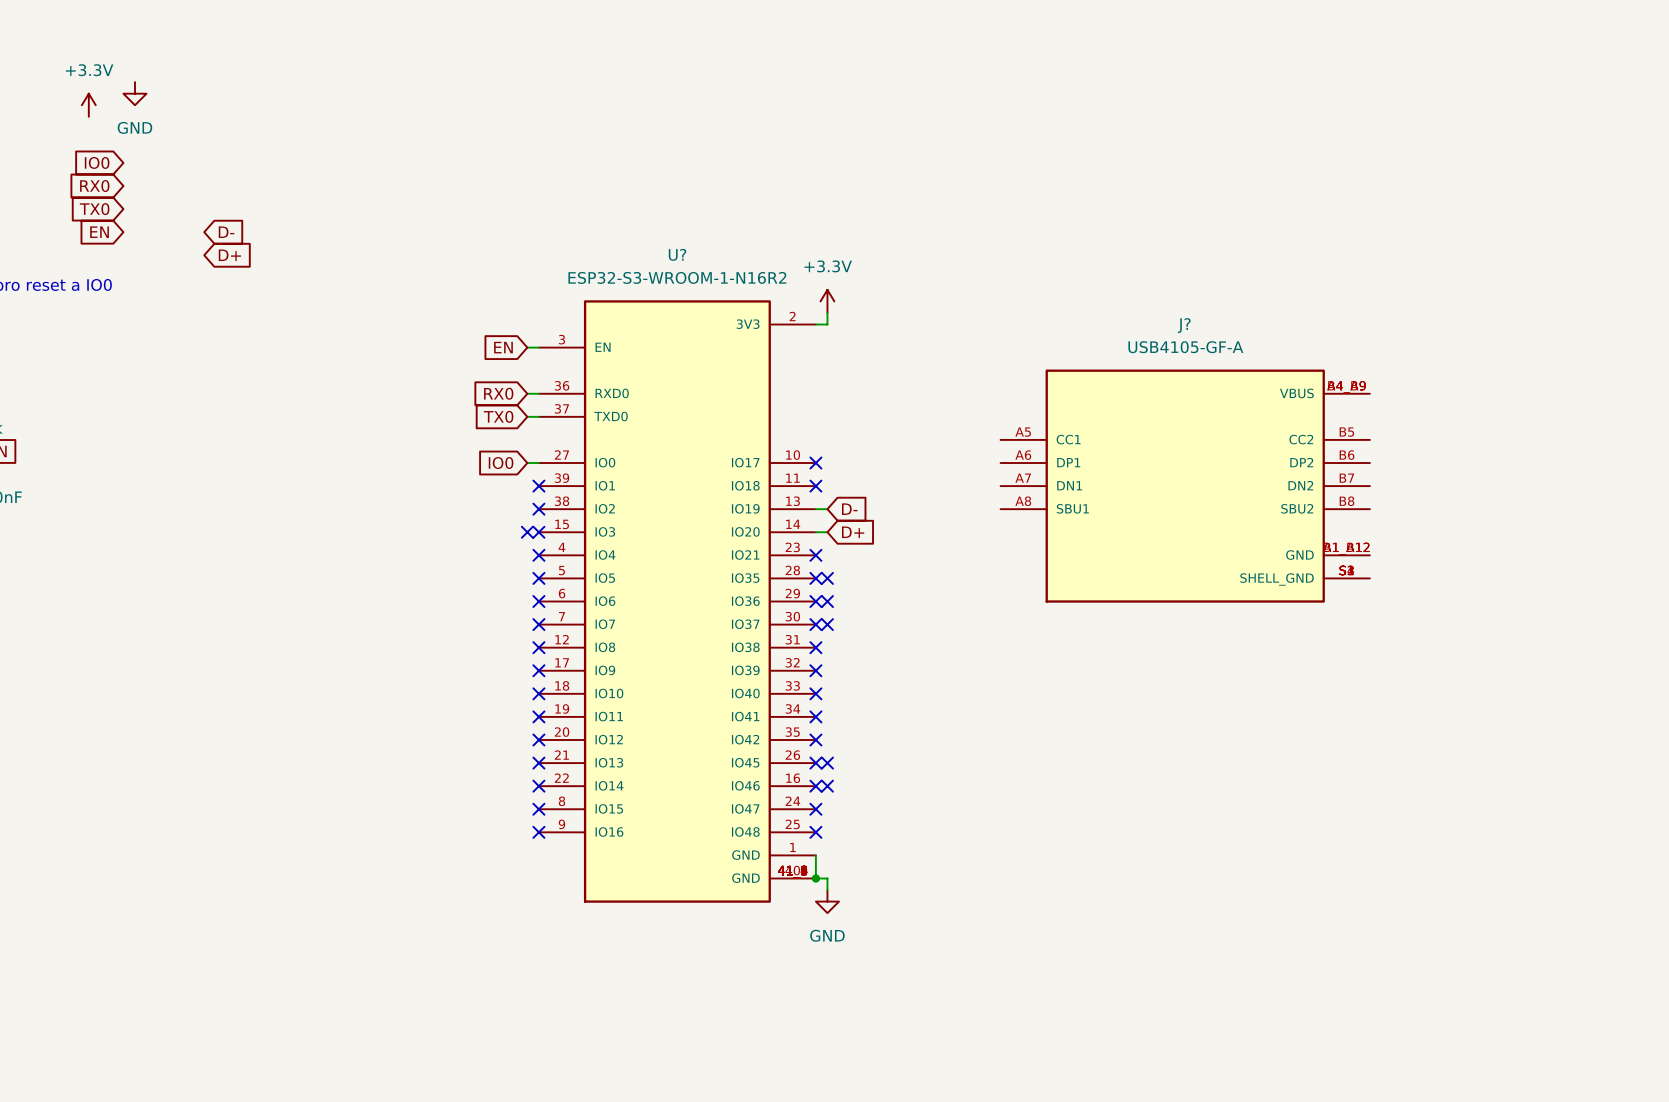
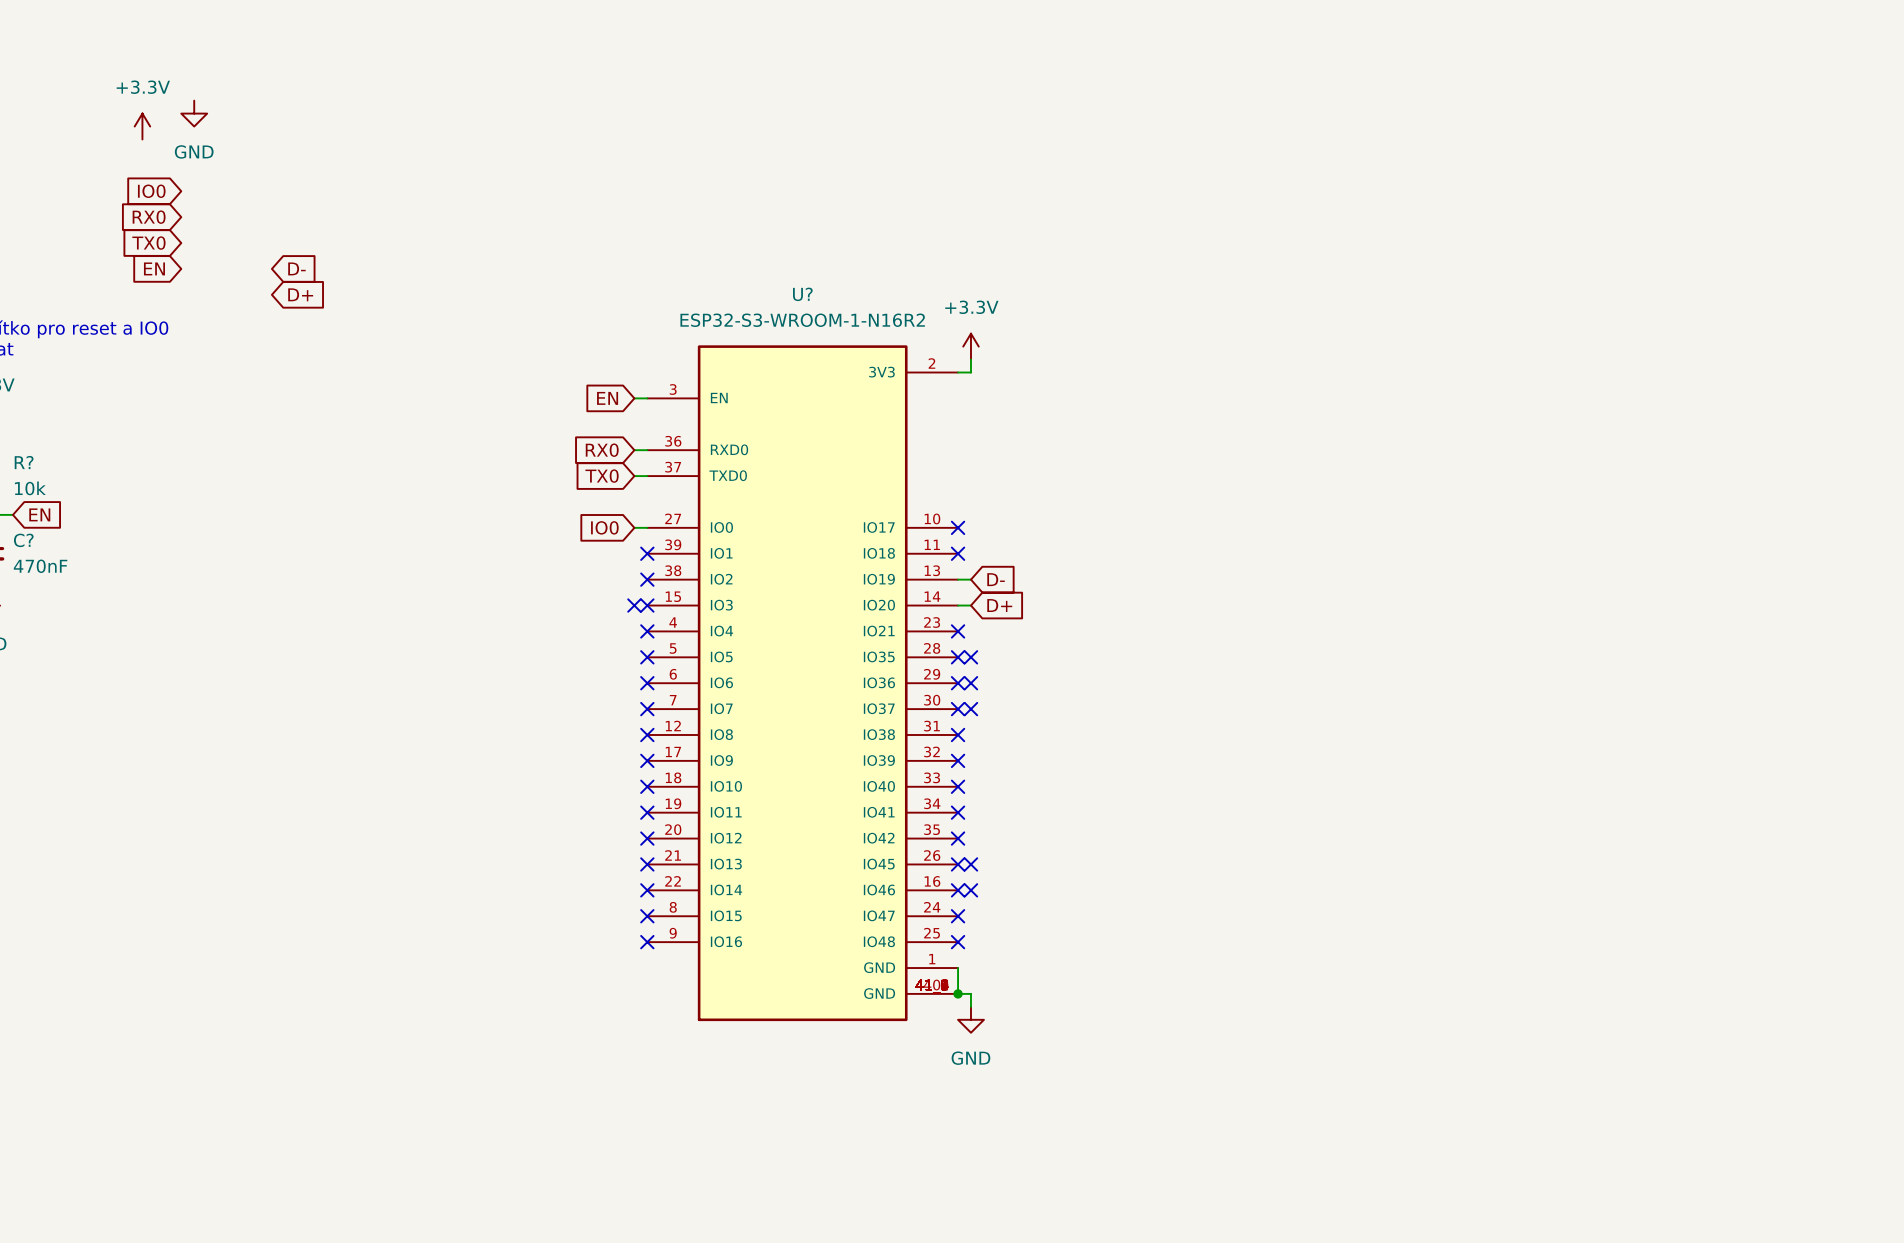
J?: USB4105-GF-A (1185, 486) -> none

